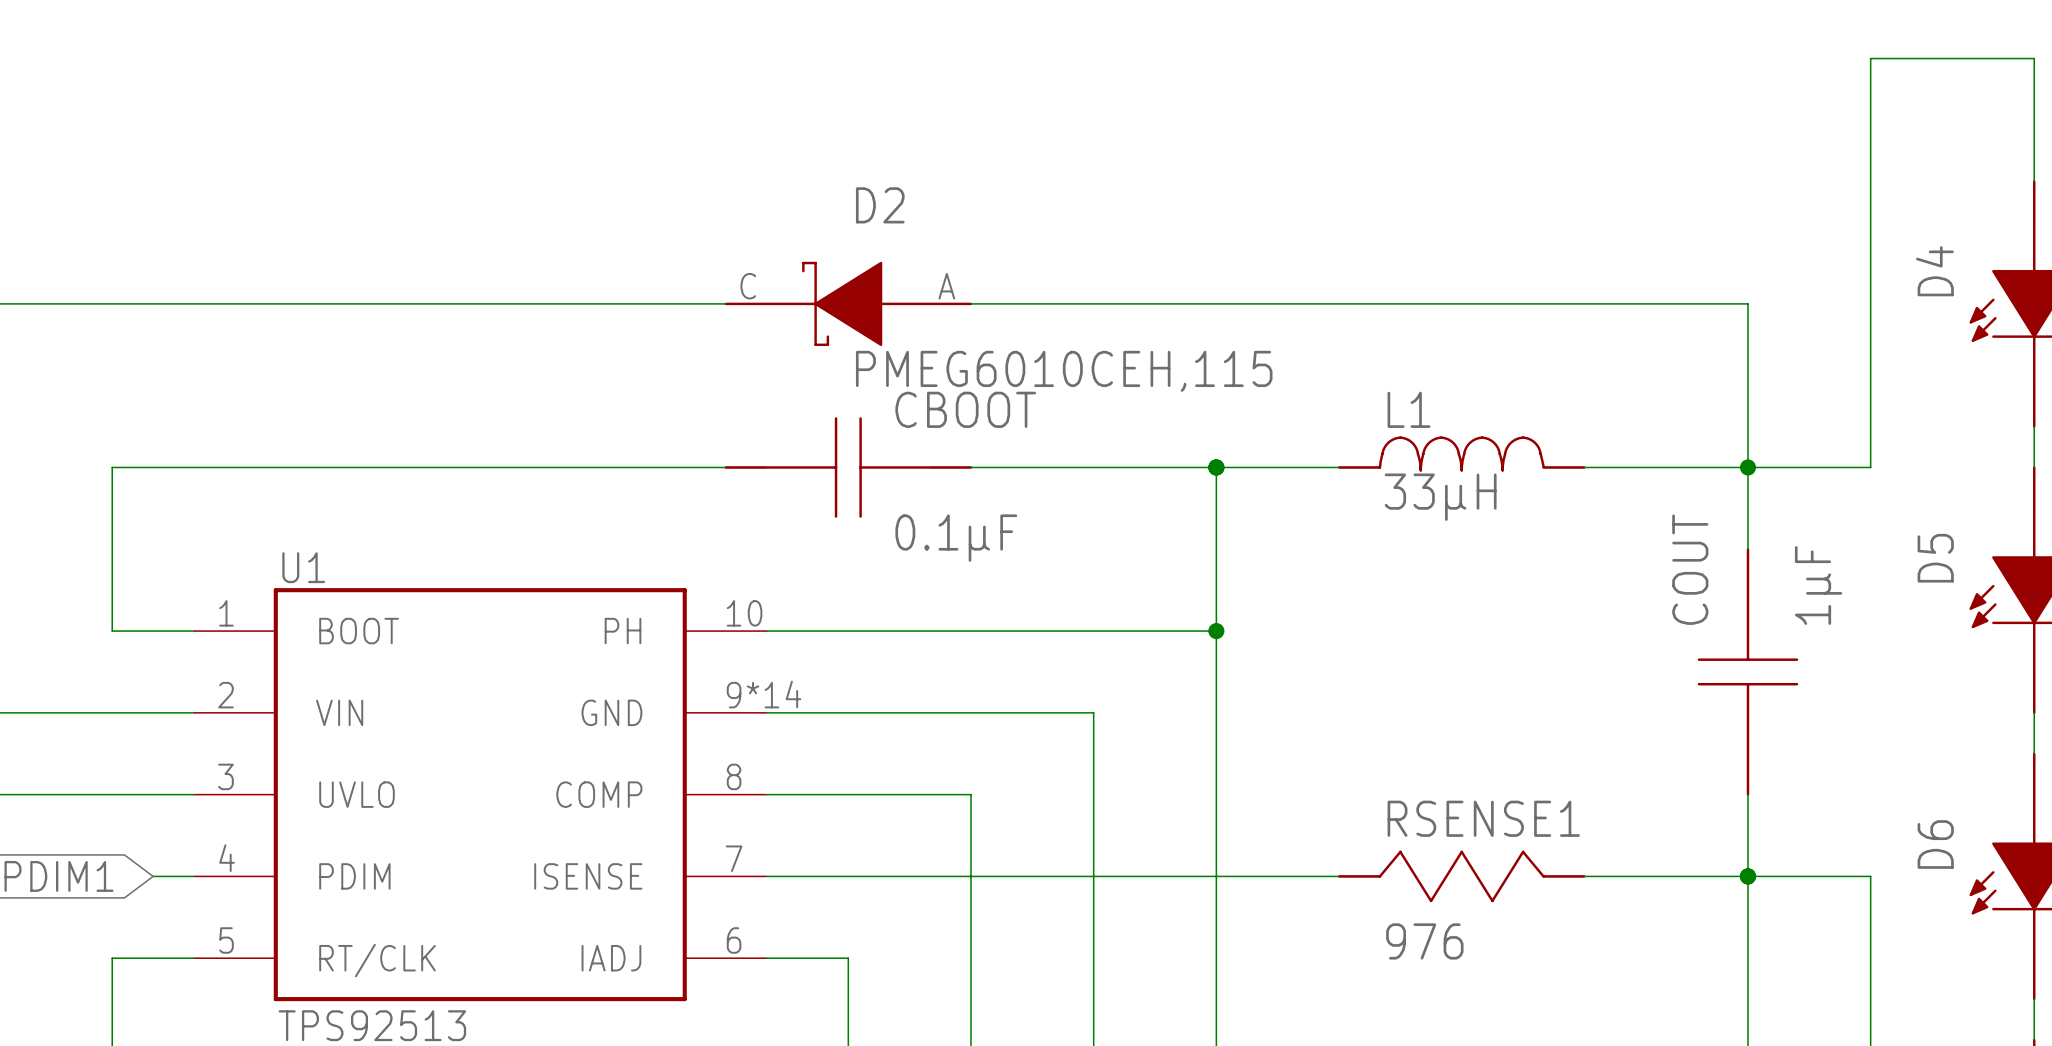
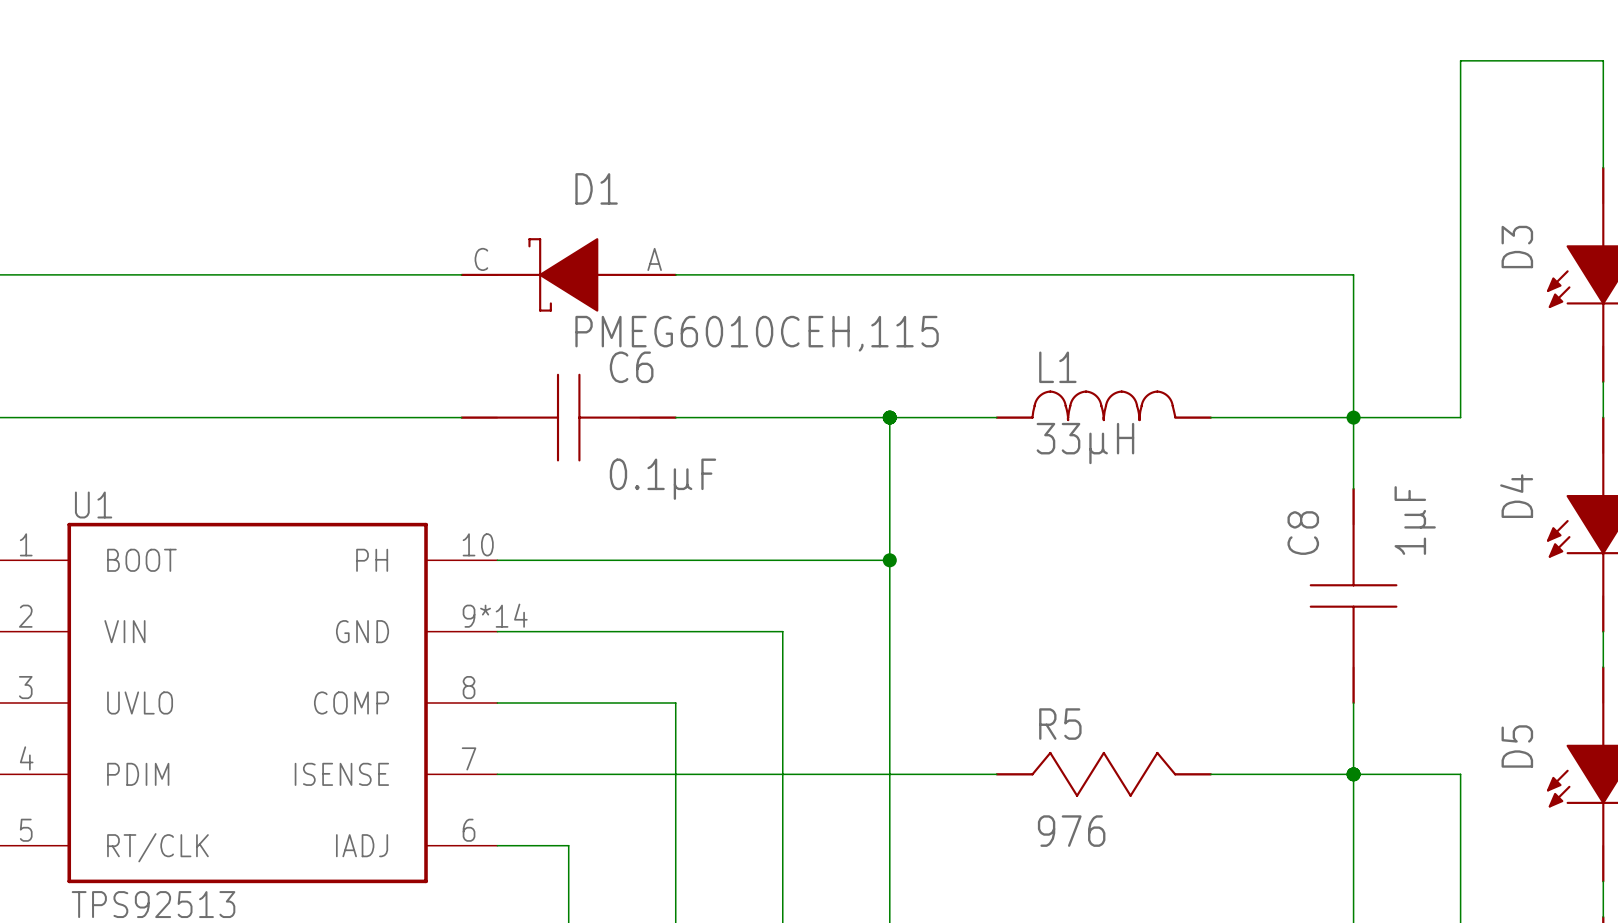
D2 name: D2 (880, 205) -> D1 (596, 188)
D4 name: D4 (1934, 271) -> D3 (1517, 247)
CBOOT name: CBOOT (965, 409) -> C6 (631, 367)
D5 name: D5 (1935, 558) -> D4 (1516, 496)
COUT name: COUT (1690, 569) -> C8 (1303, 533)
RSENSE1 name: RSENSE1 (1483, 818) -> R5 (1060, 724)
D6 name: D6 (1935, 844) -> D5 (1517, 746)

